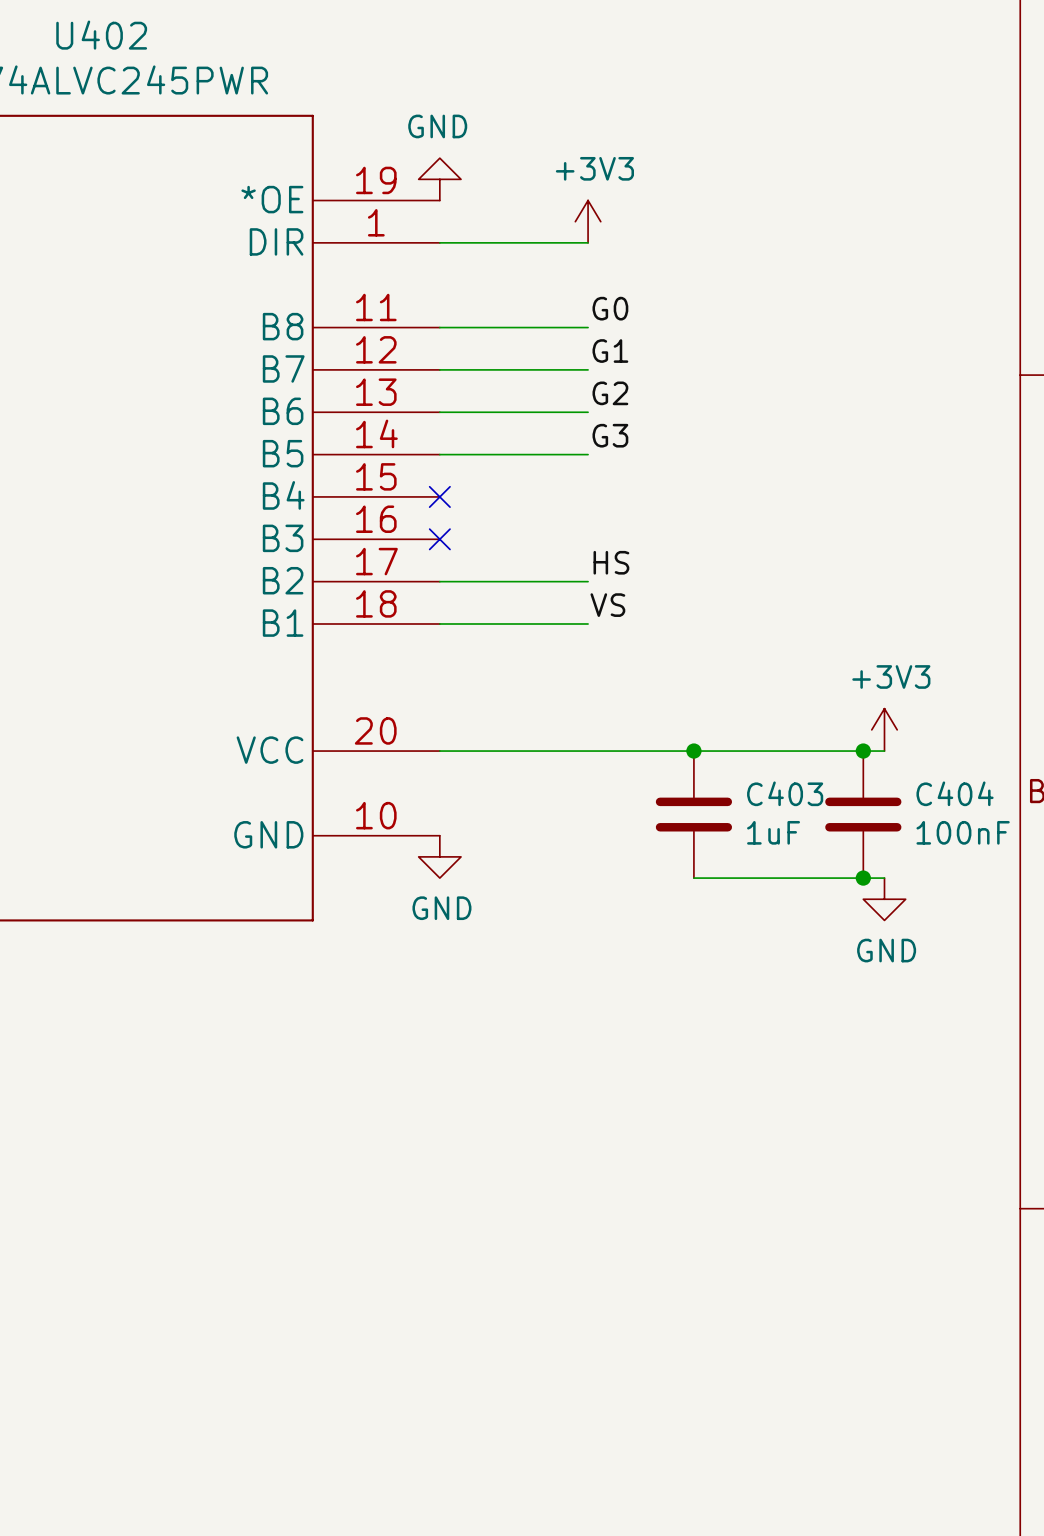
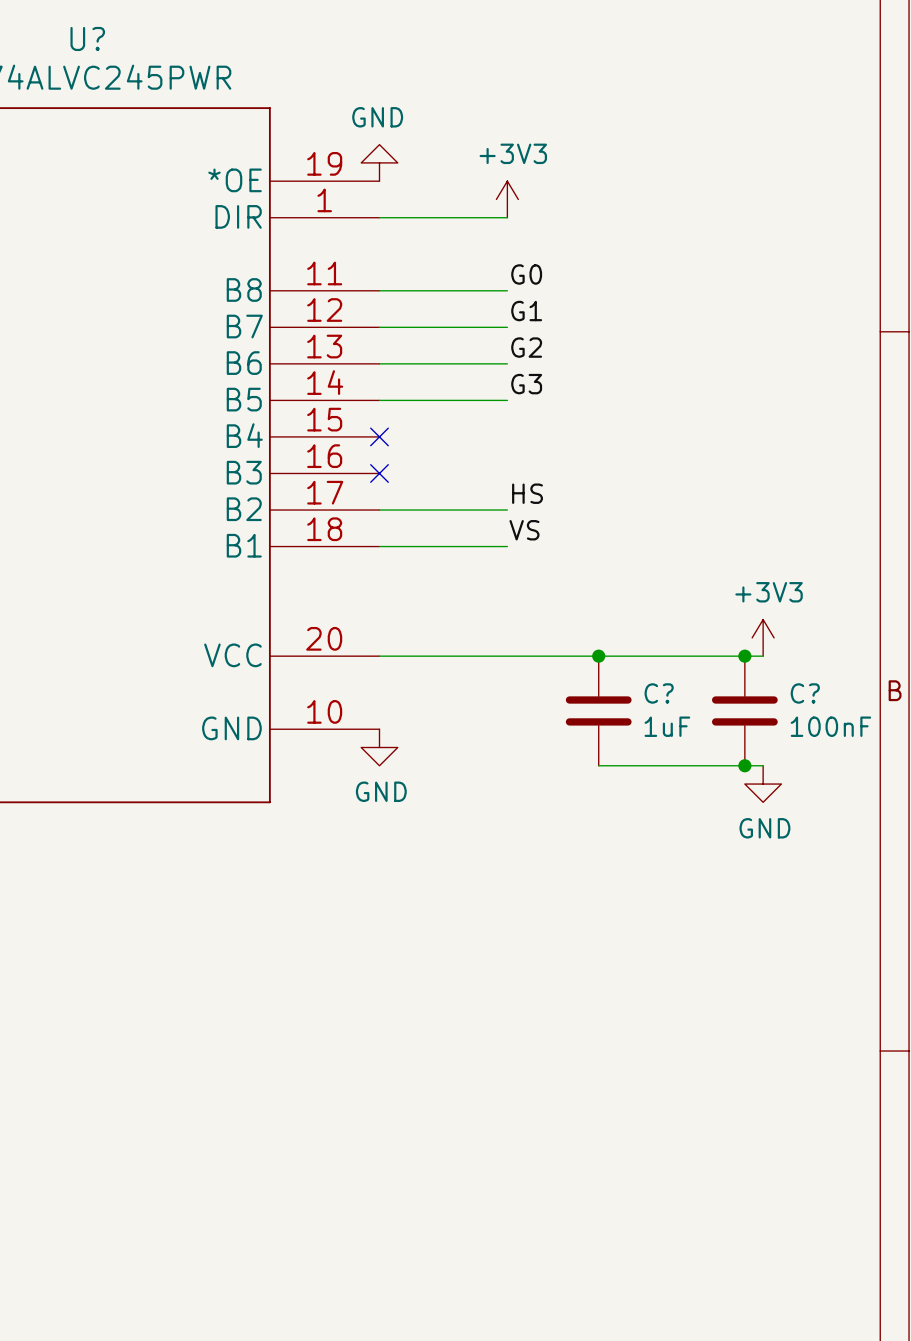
U402 name: U402 (101, 35) -> U? (87, 38)
C403 name: C403 (785, 793) -> C? (659, 693)
C404 name: C404 (955, 793) -> C? (805, 693)

